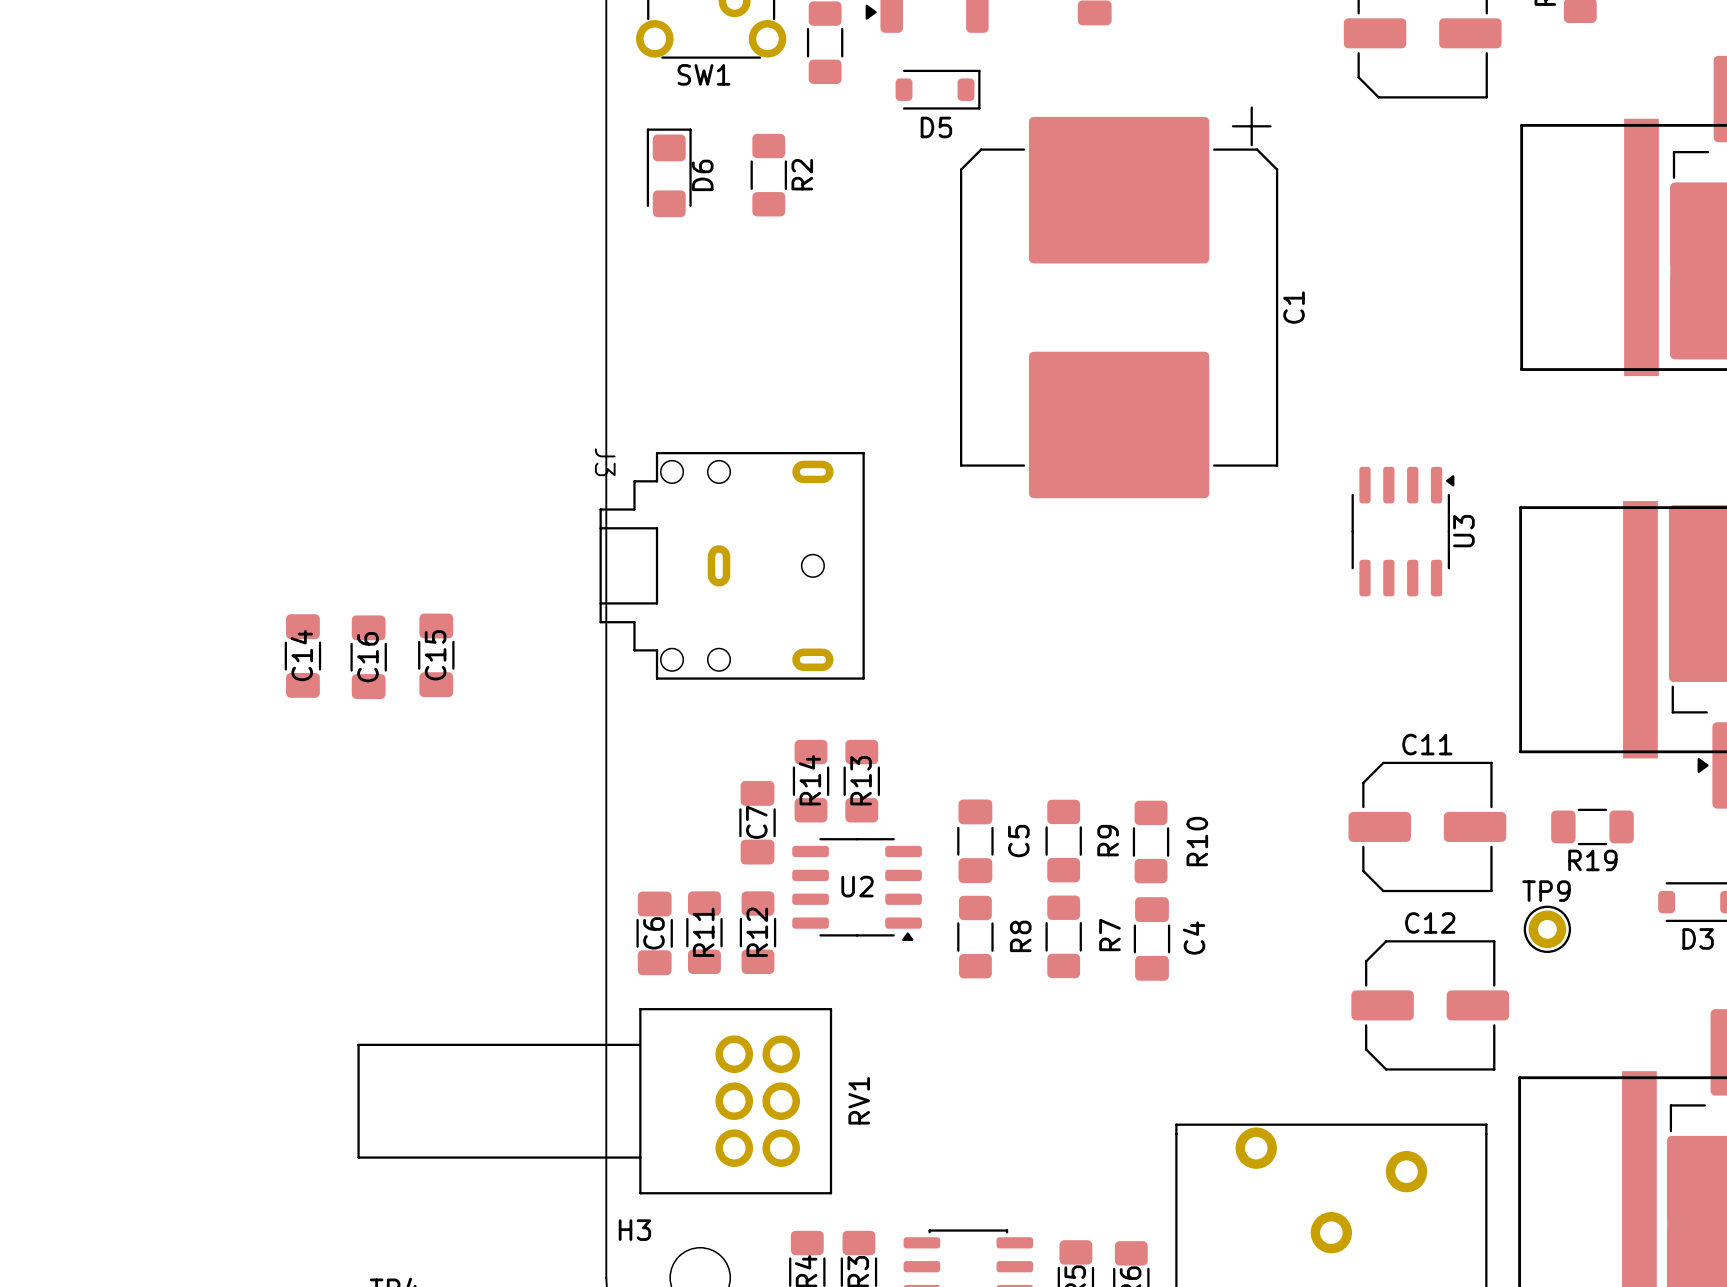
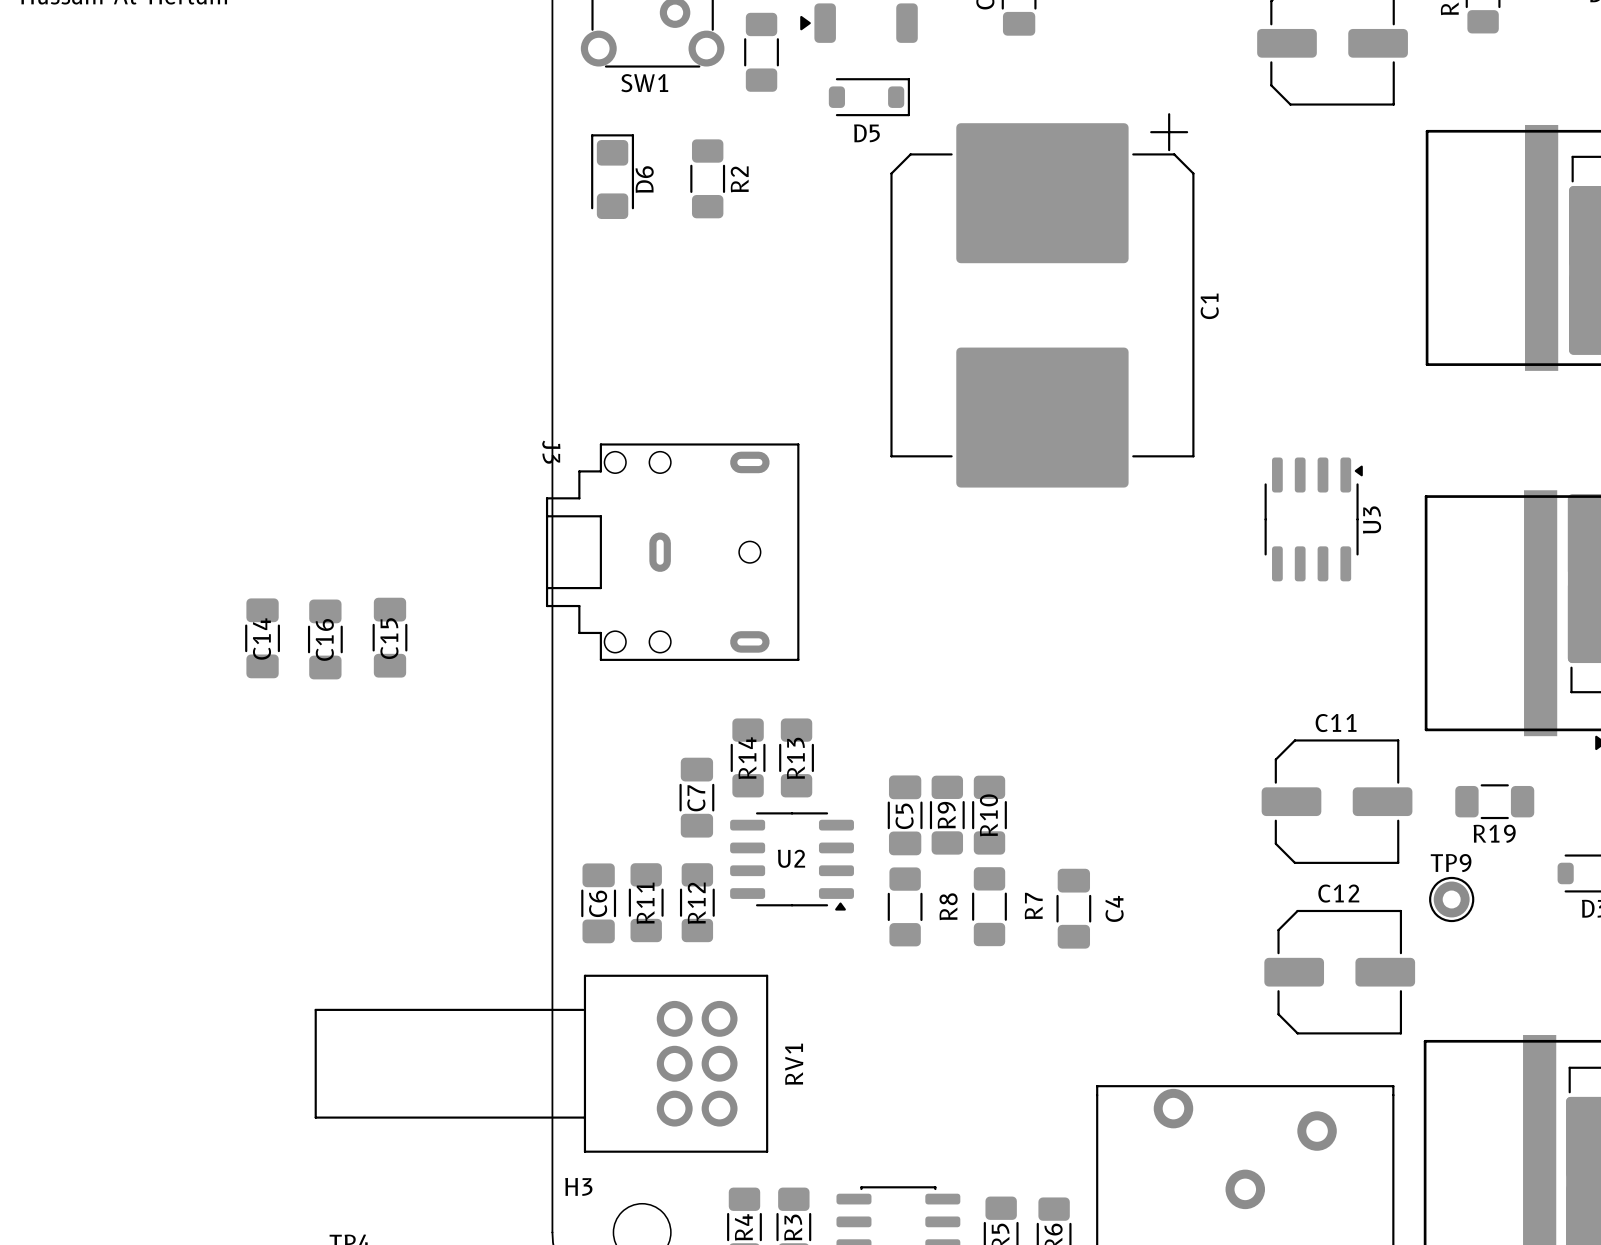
R9 name: R9 (1108, 840) -> R10 (988, 815)
C5 name position: C5 (1018, 841) -> C5 (904, 816)
R9: none -> (947, 815)
R10: (1151, 841) -> none

